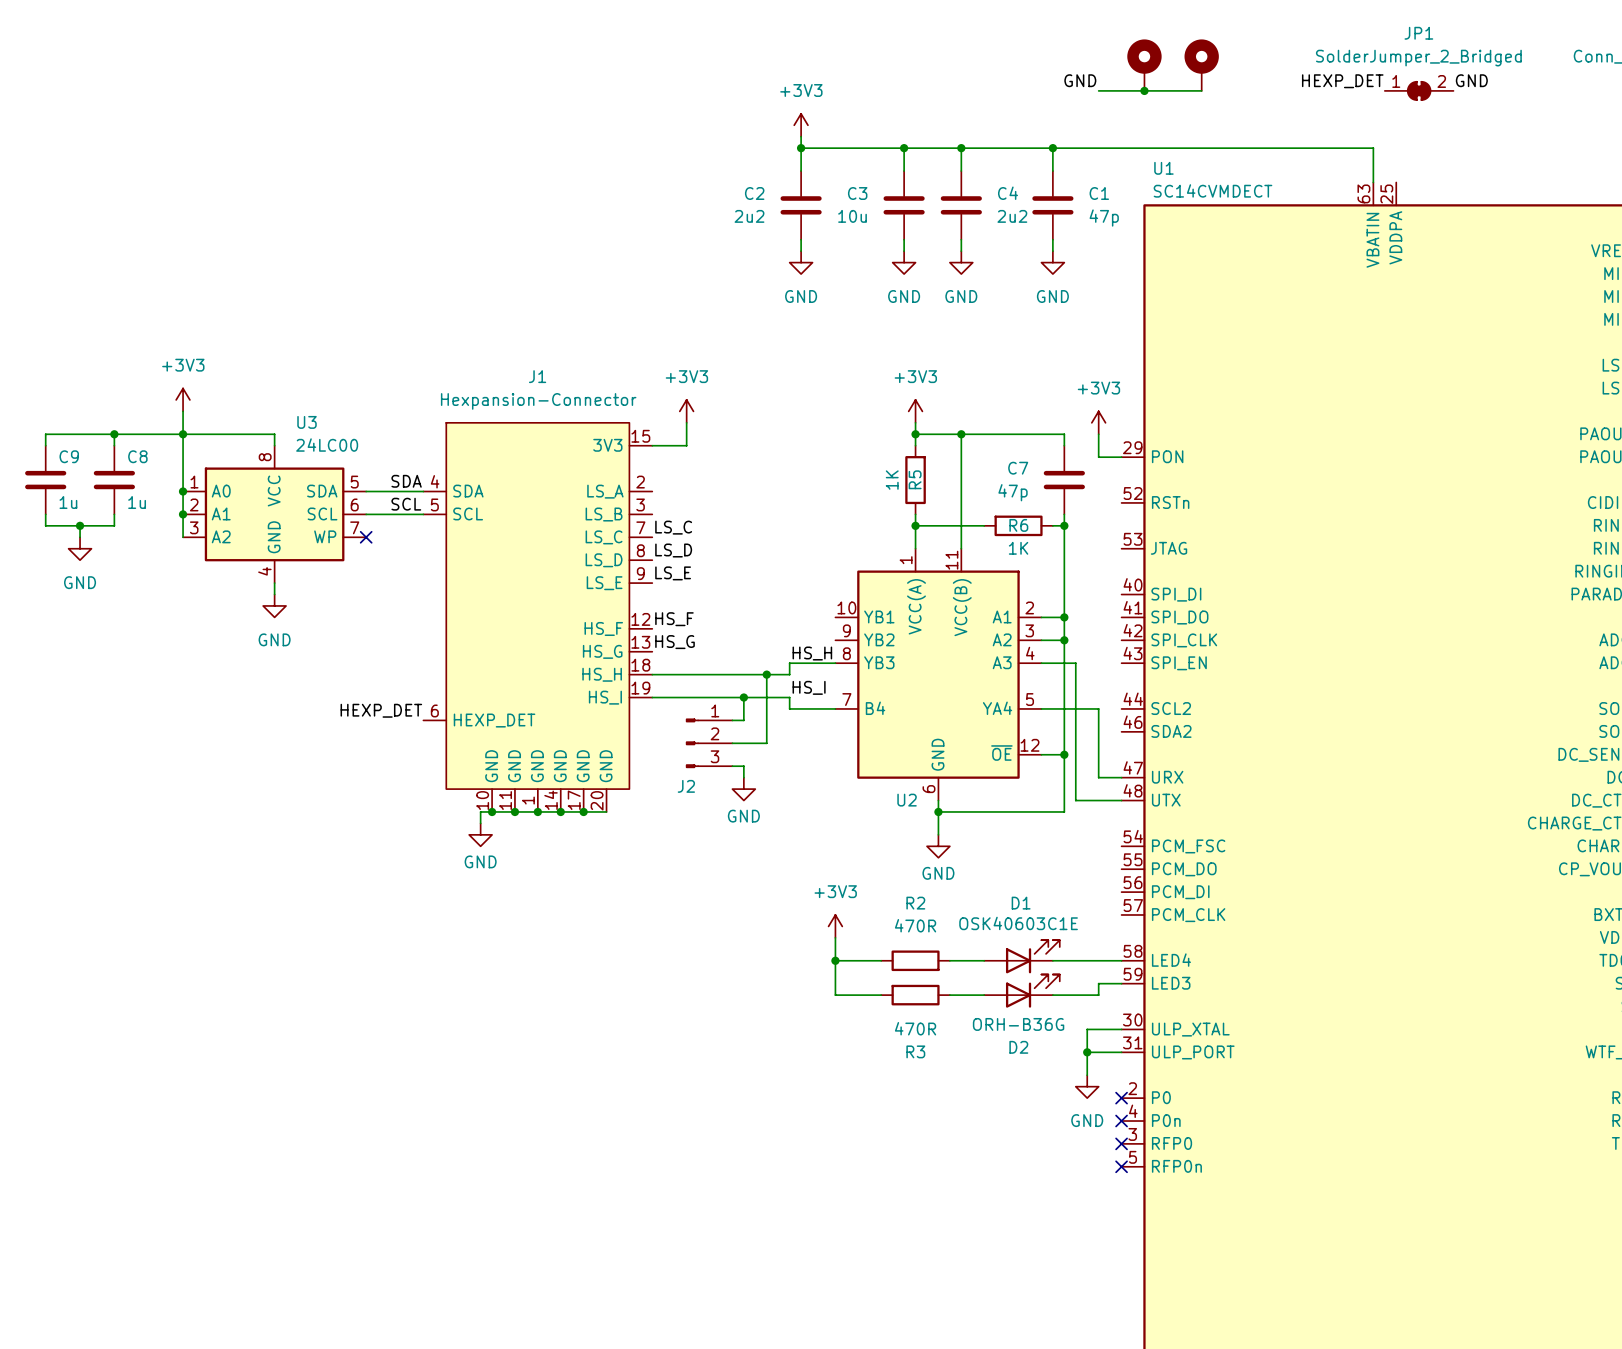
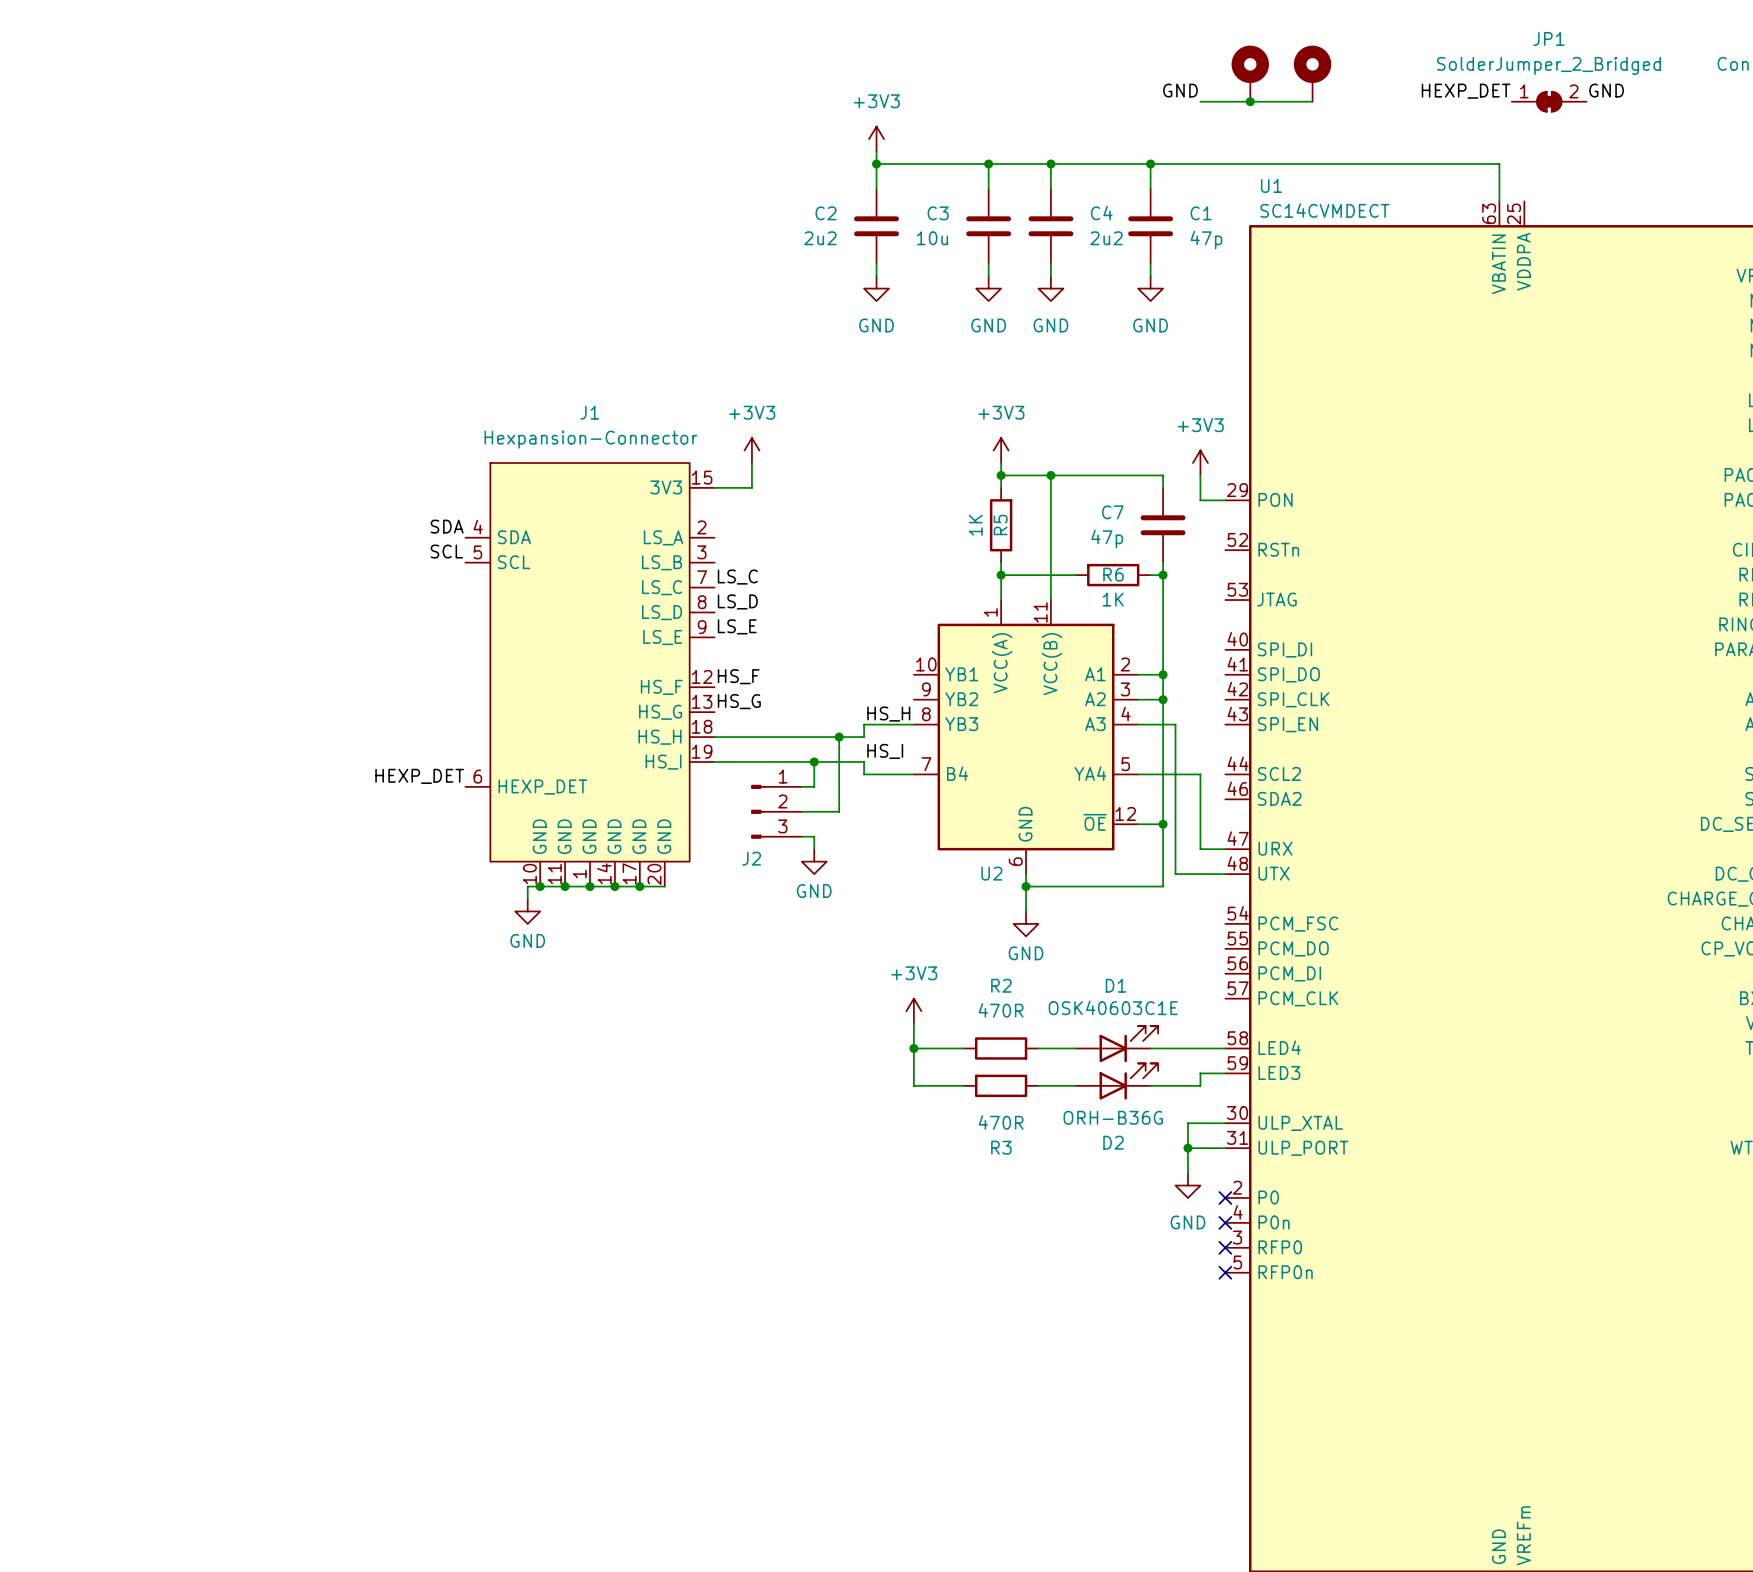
power symbol: +3V3 (183, 399) -> none
wire: (183, 411) (183, 537) -> none
wire: (114, 434) (114, 445) -> none
junction: (114, 434) -> none
junction: (183, 434) -> none
wire: (45, 445) (45, 434) (274, 434) (274, 445) -> none
C9: 1u (45, 480) -> none
C8: 1u (114, 480) -> none
junction: (183, 491) -> none
wire: (366, 491) (423, 491) -> none
wire: (45, 514) (45, 525) (114, 525) (114, 514) -> none
junction: (183, 514) -> none
U3: 24LC00 (274, 514) -> none
wire: (366, 514) (423, 514) -> none
wire: (80, 525) (80, 537) -> none
junction: (80, 525) -> none
no-connect mark: (366, 537) -> none
power symbol: GND (80, 548) -> none
wire: (274, 583) (274, 594) -> none
power symbol: GND (274, 605) -> none

